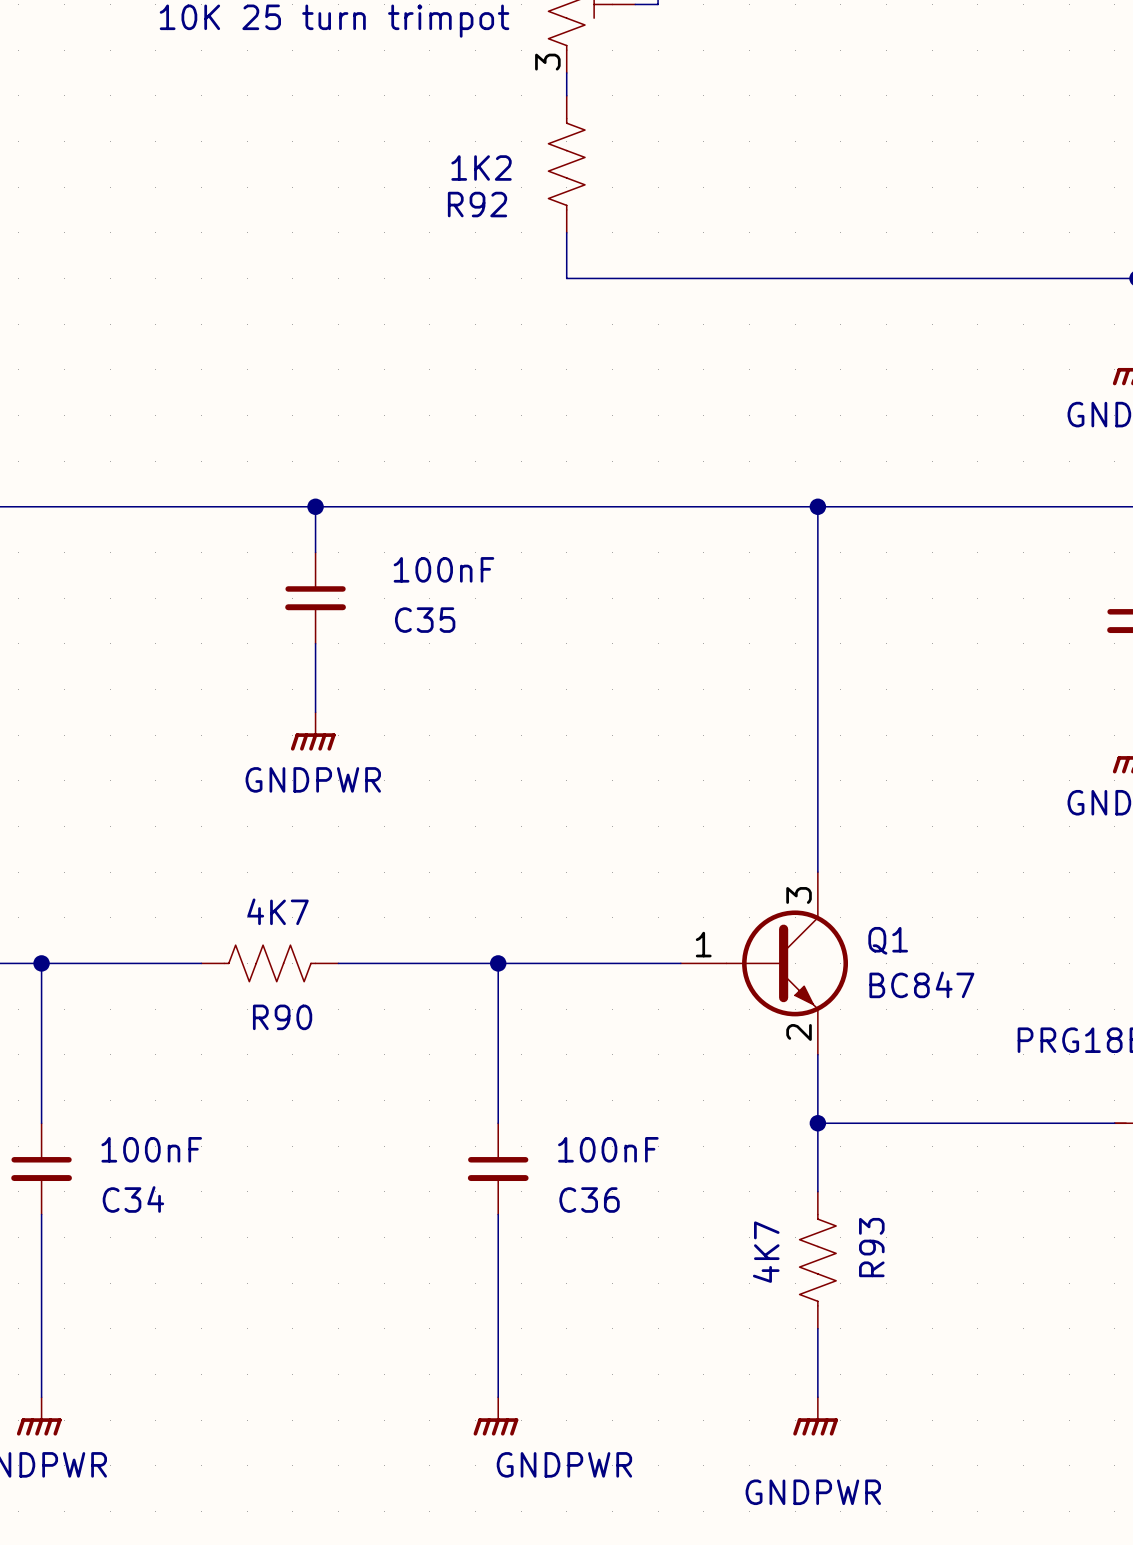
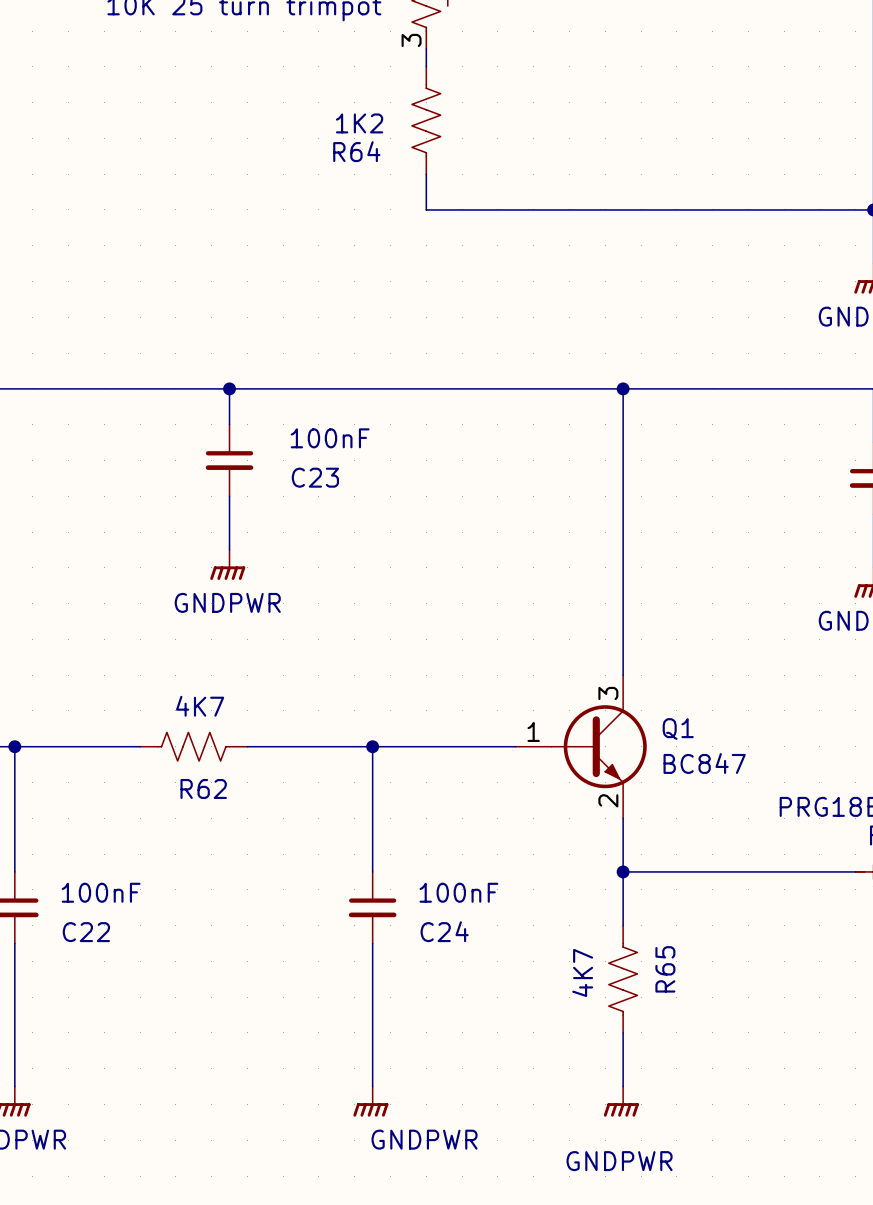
R92 name: R92 (477, 204) -> R64 (356, 151)
C35 name: C35 (425, 620) -> C23 (315, 477)
R90 name: R90 (282, 1017) -> R62 (203, 788)
C34 name: C34 (133, 1199) -> C22 (86, 932)
C36 name: C36 (589, 1200) -> C24 (444, 931)
R93 name: R93 (871, 1247) -> R65 (665, 969)

